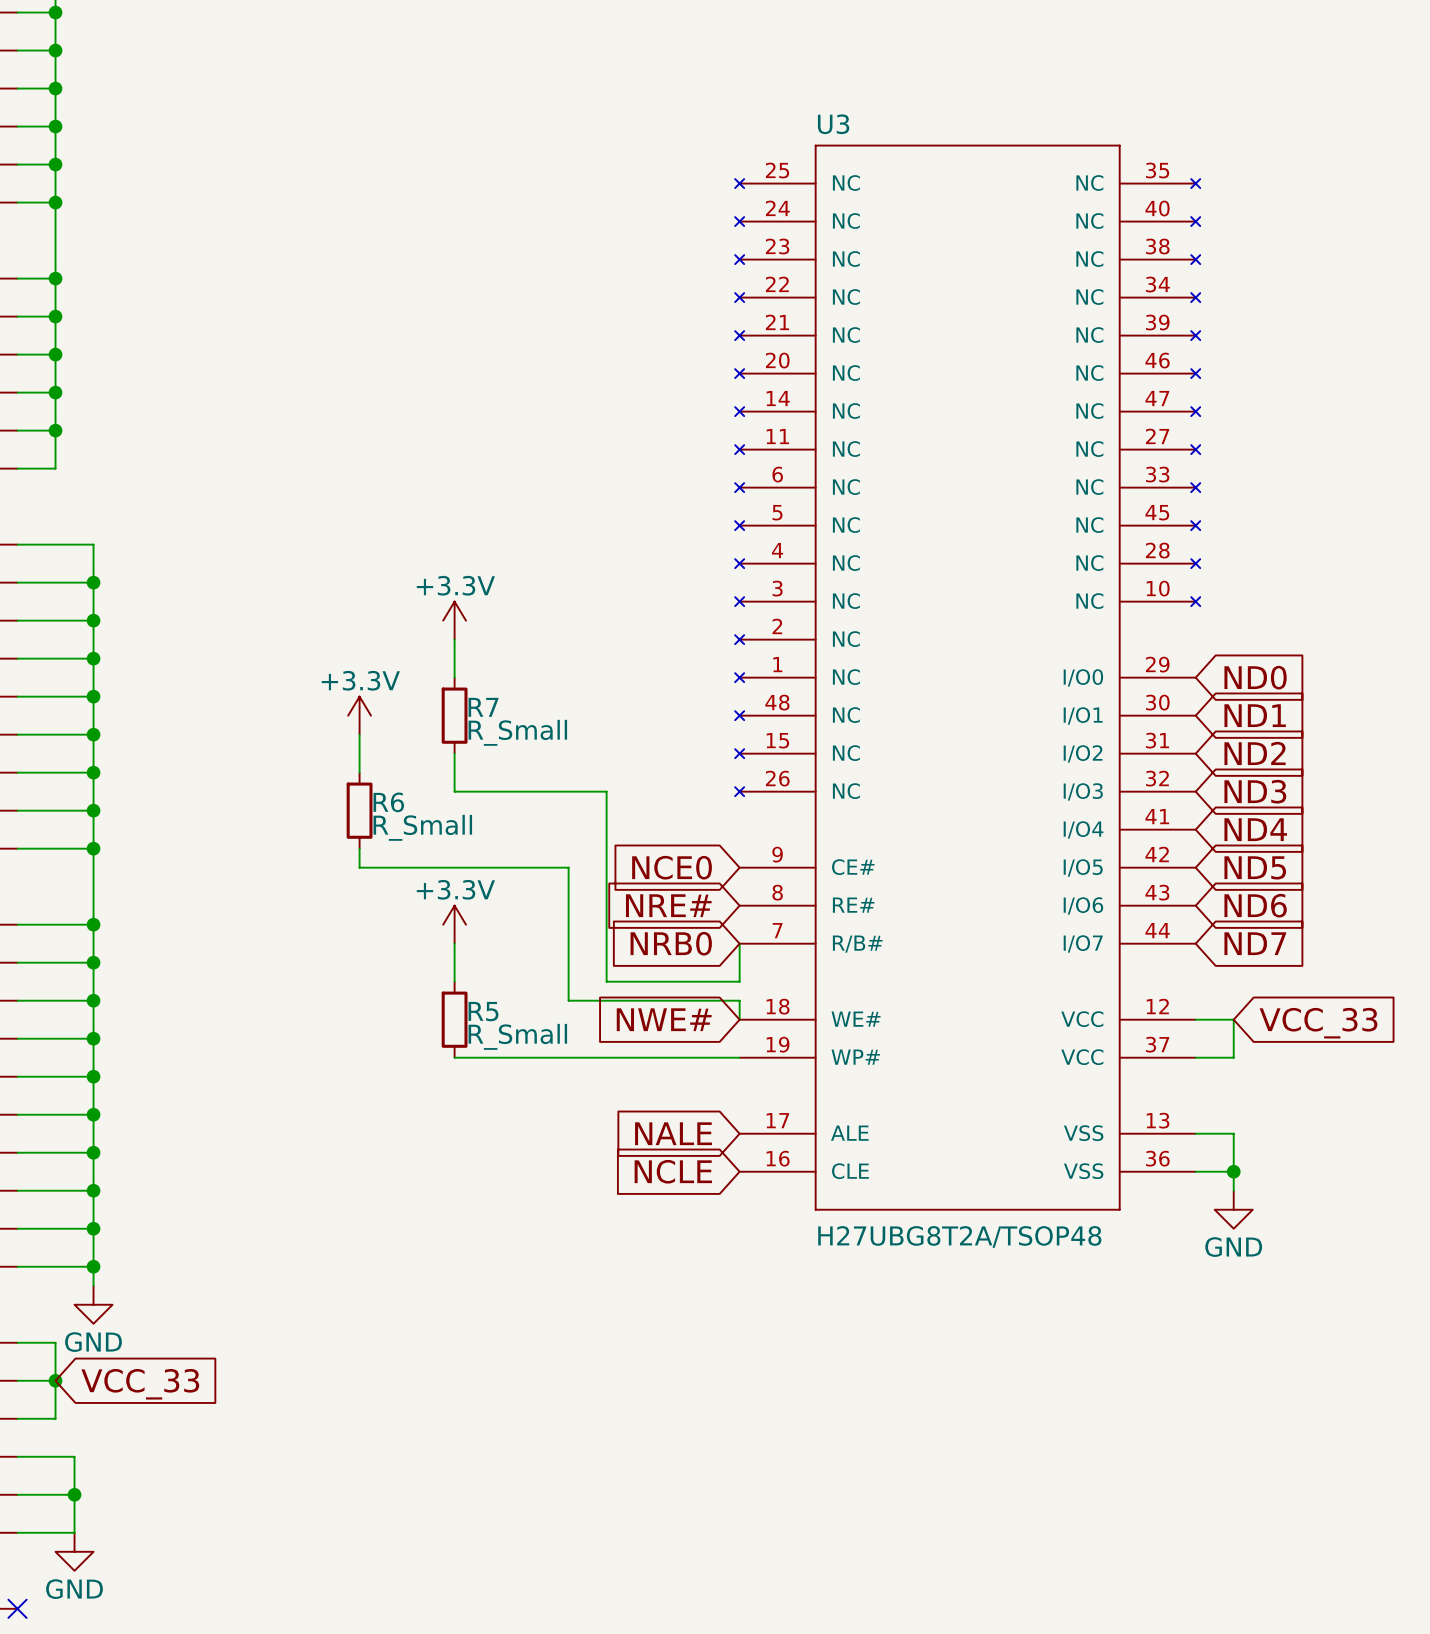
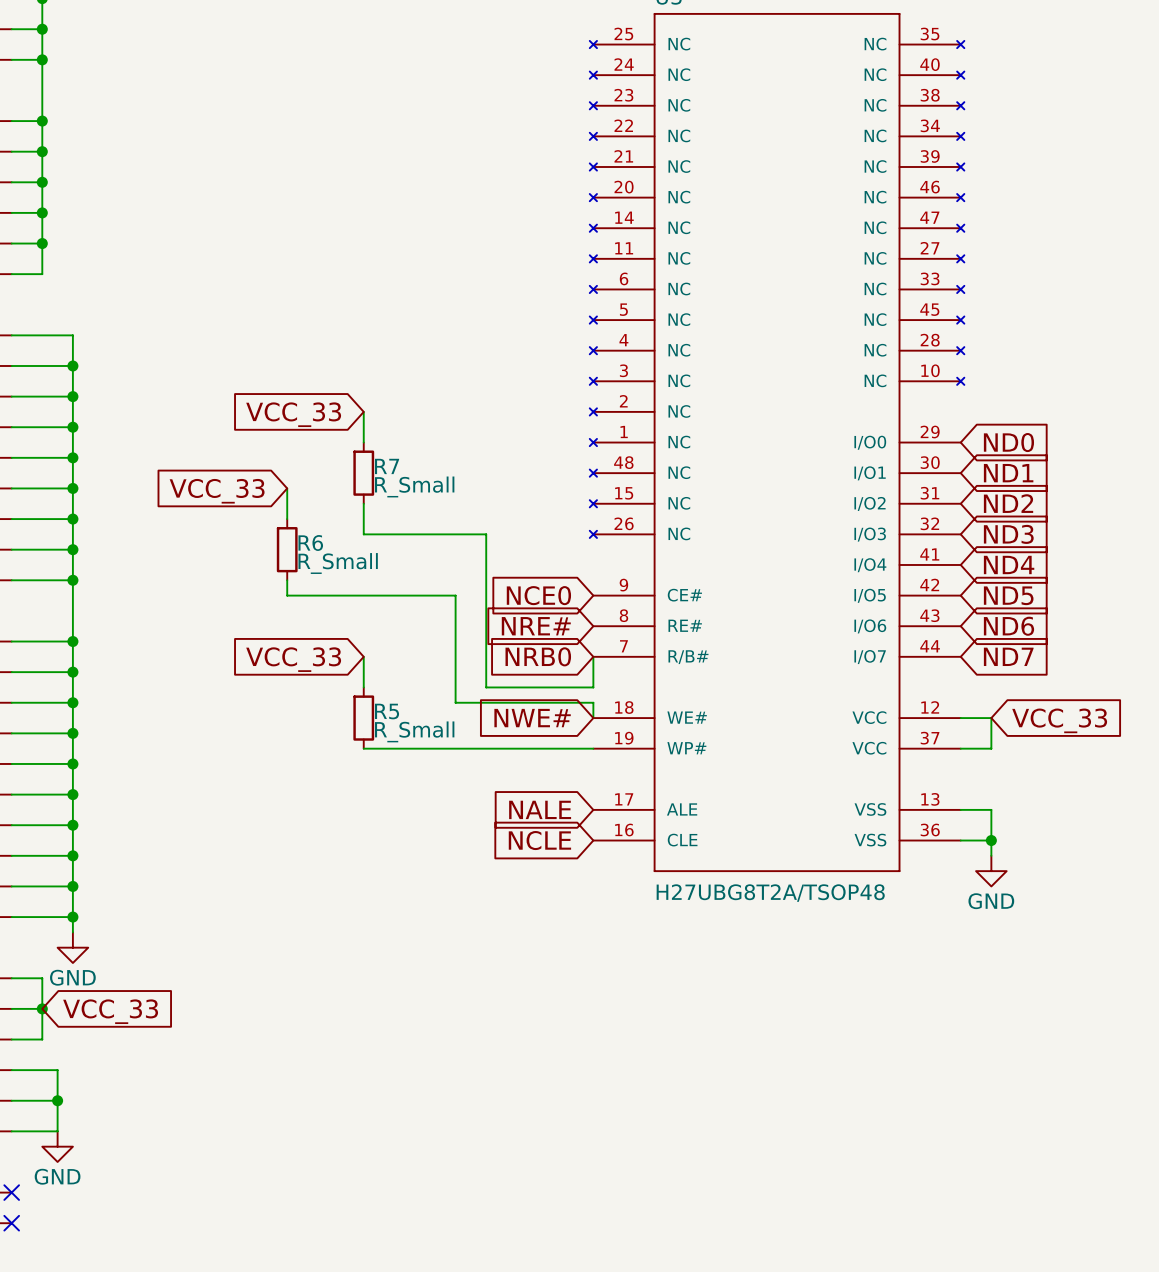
power symbol: +3.3V (454, 620) -> none
global label: none -> VCC_33 (293, 414)
power symbol: +3.3V (359, 715) -> none
global label: none -> VCC_33 (217, 491)
power symbol: +3.3V (454, 924) -> none
global label: none -> VCC_33 (293, 659)

